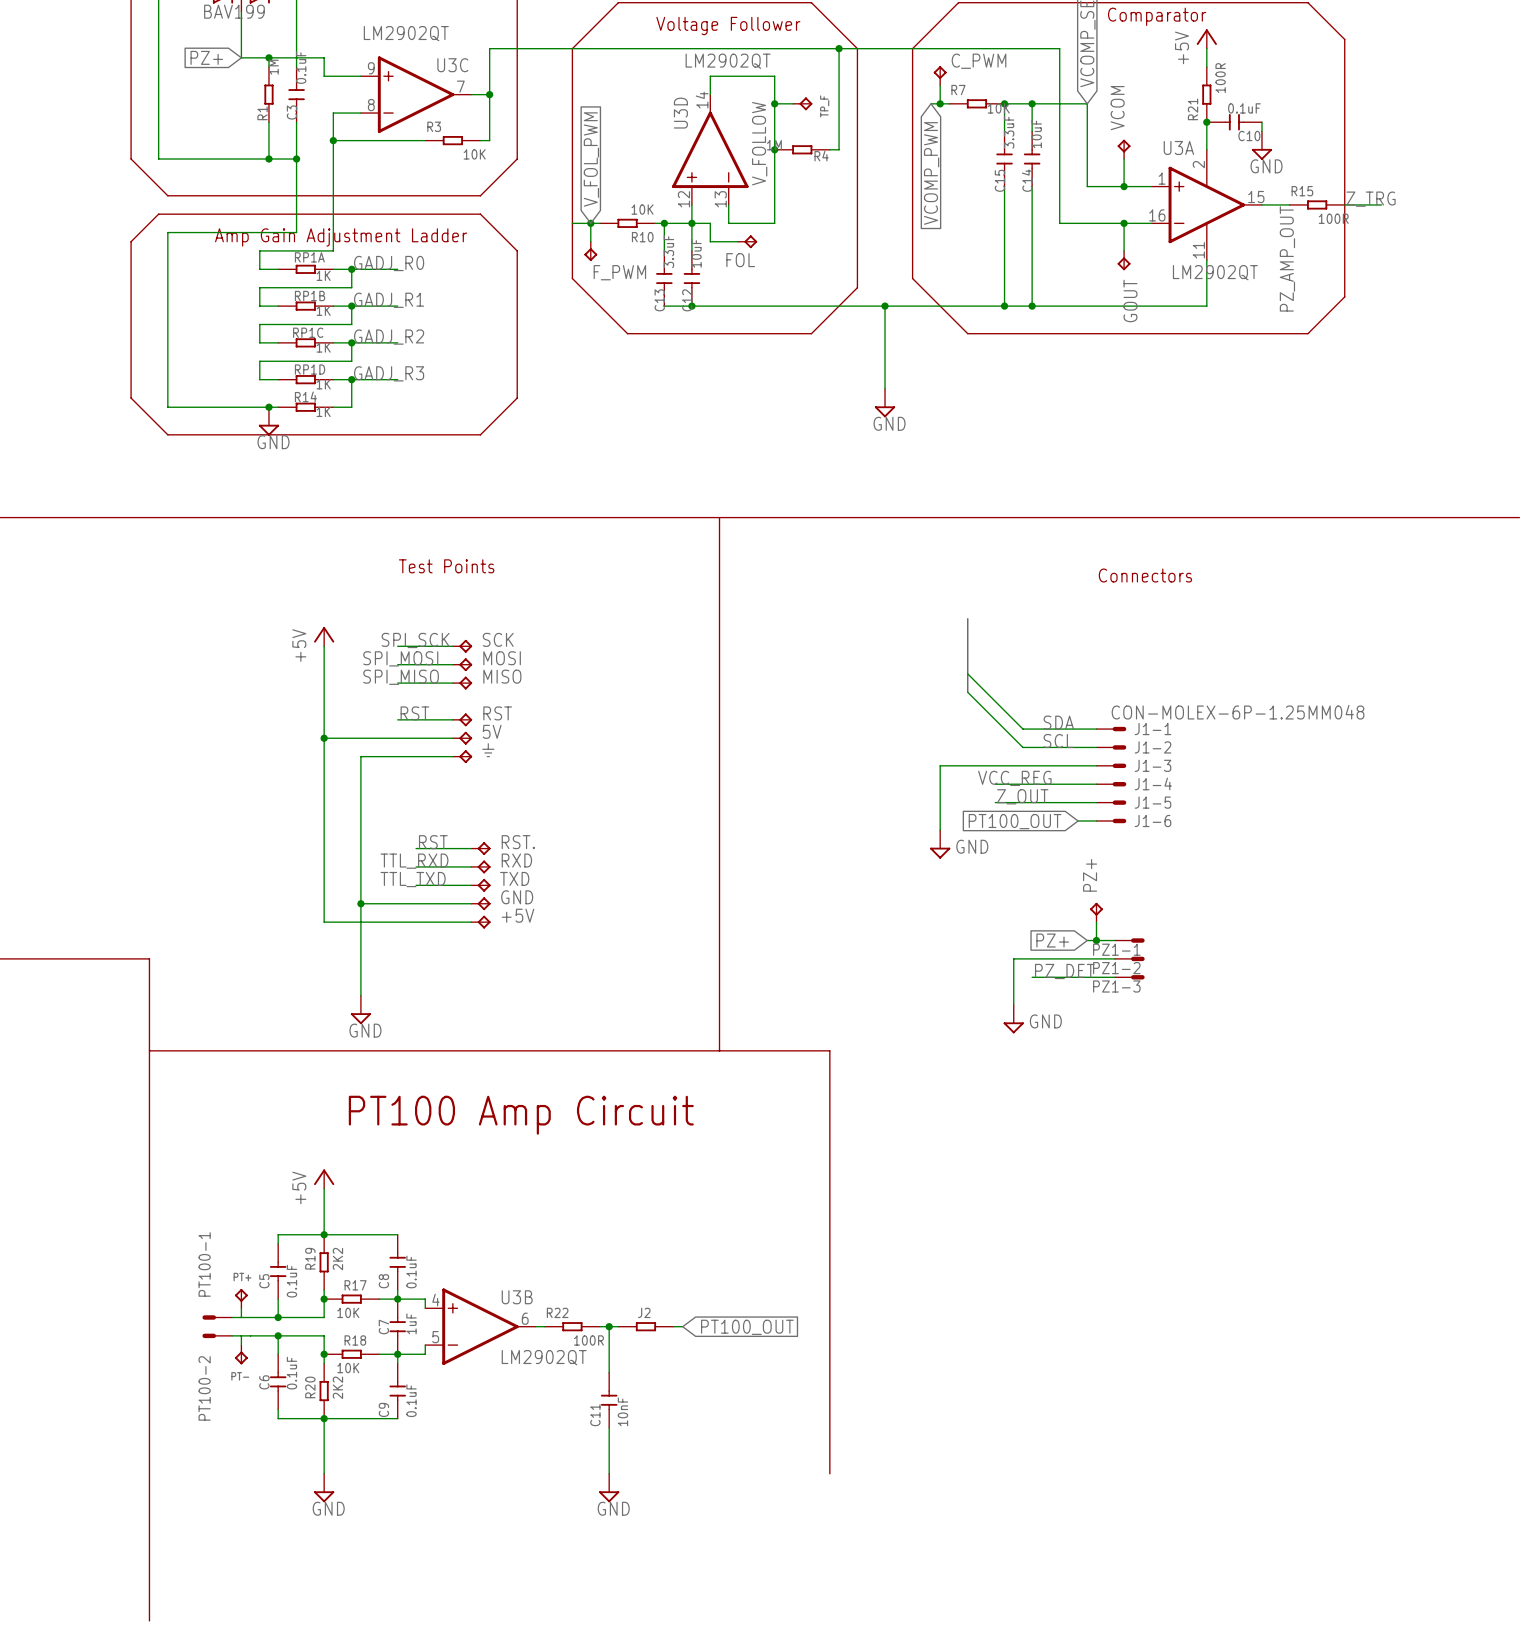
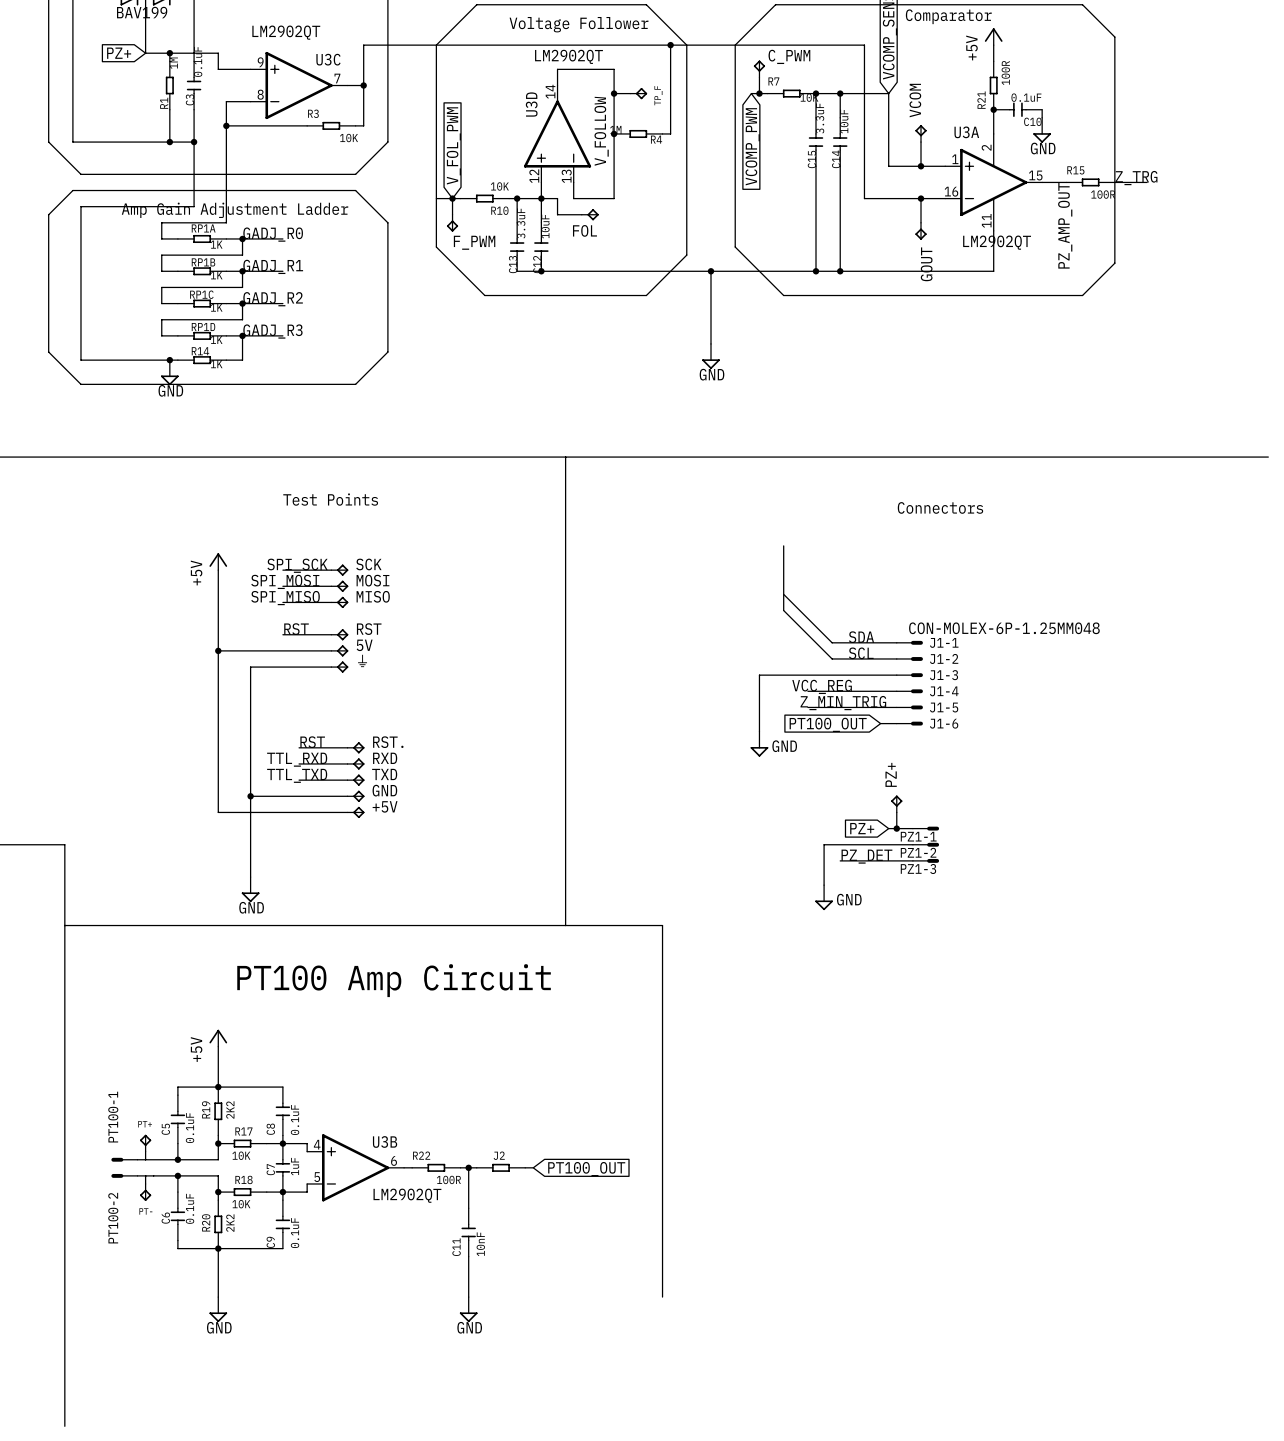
label: Z_OUT (1022, 796) -> none
label: none -> Z_MIN_TRIG (843, 703)

